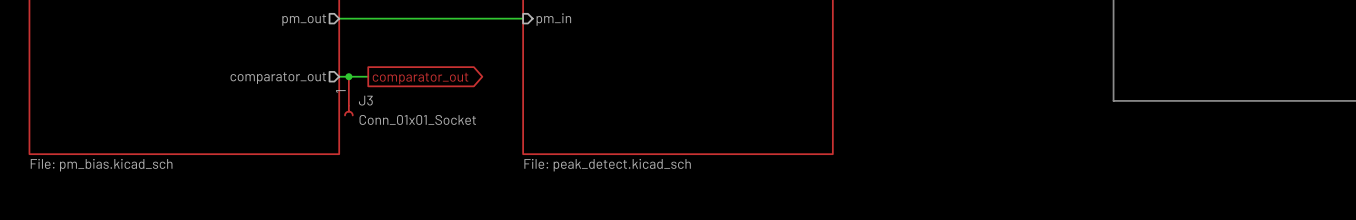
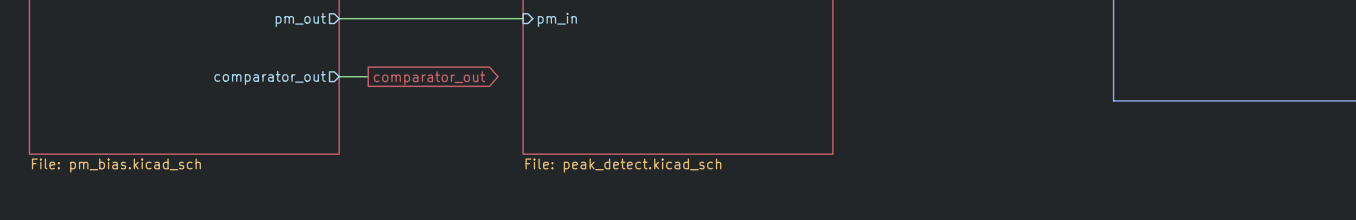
junction: (348, 76) -> none
J3: Conn_01x01_Socket (348, 96) -> none

